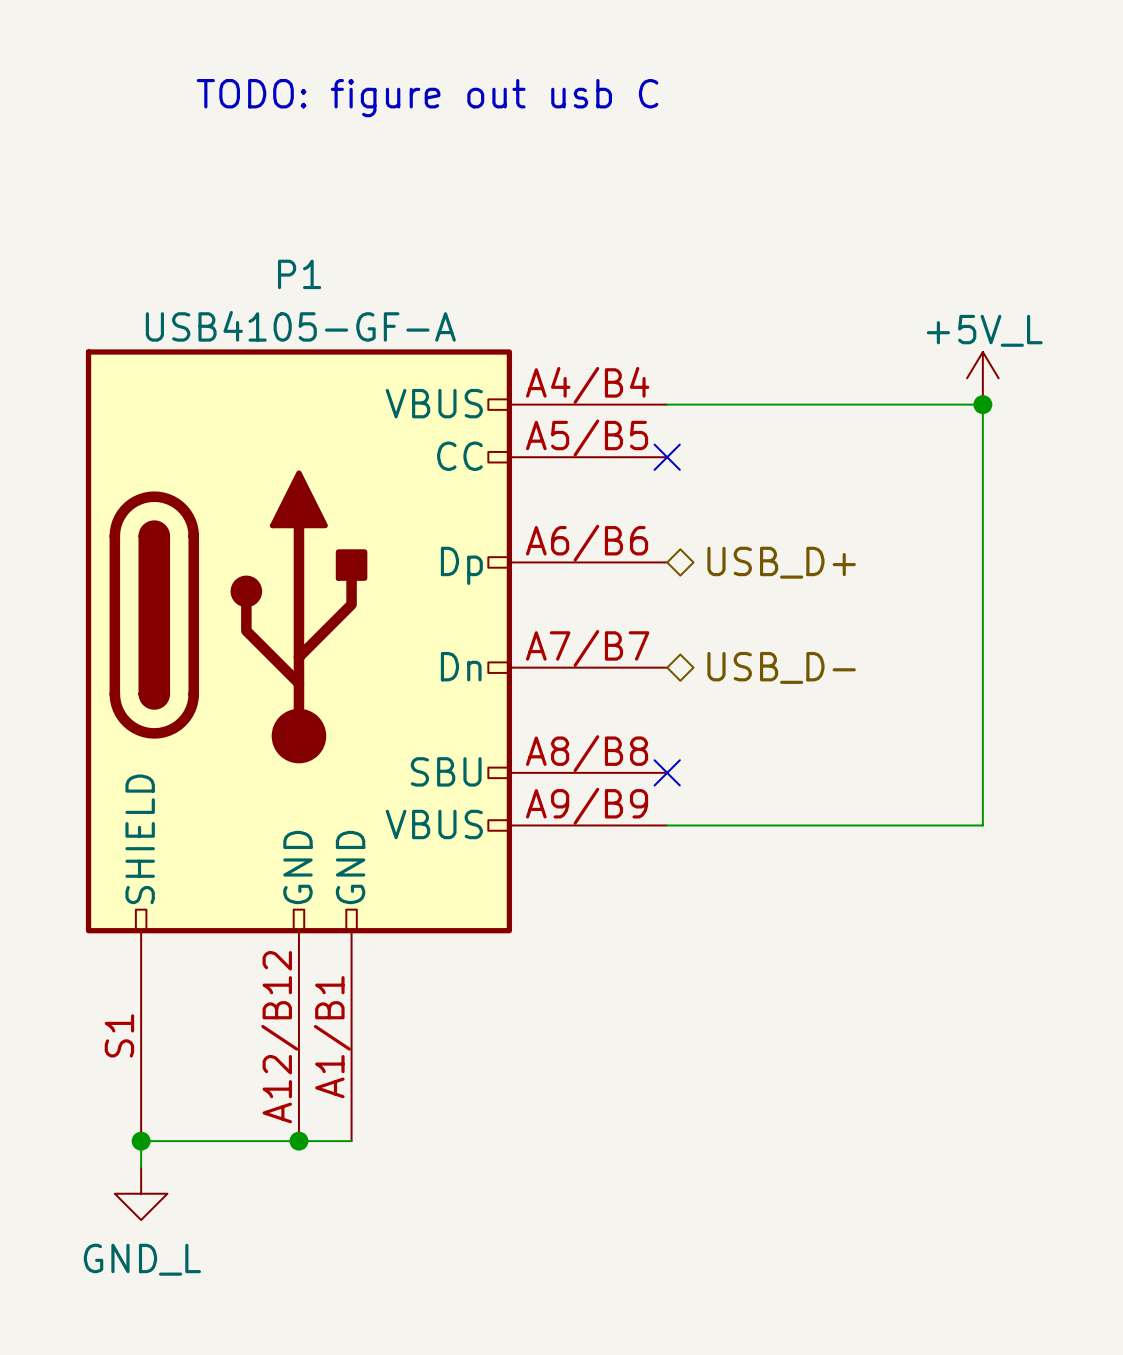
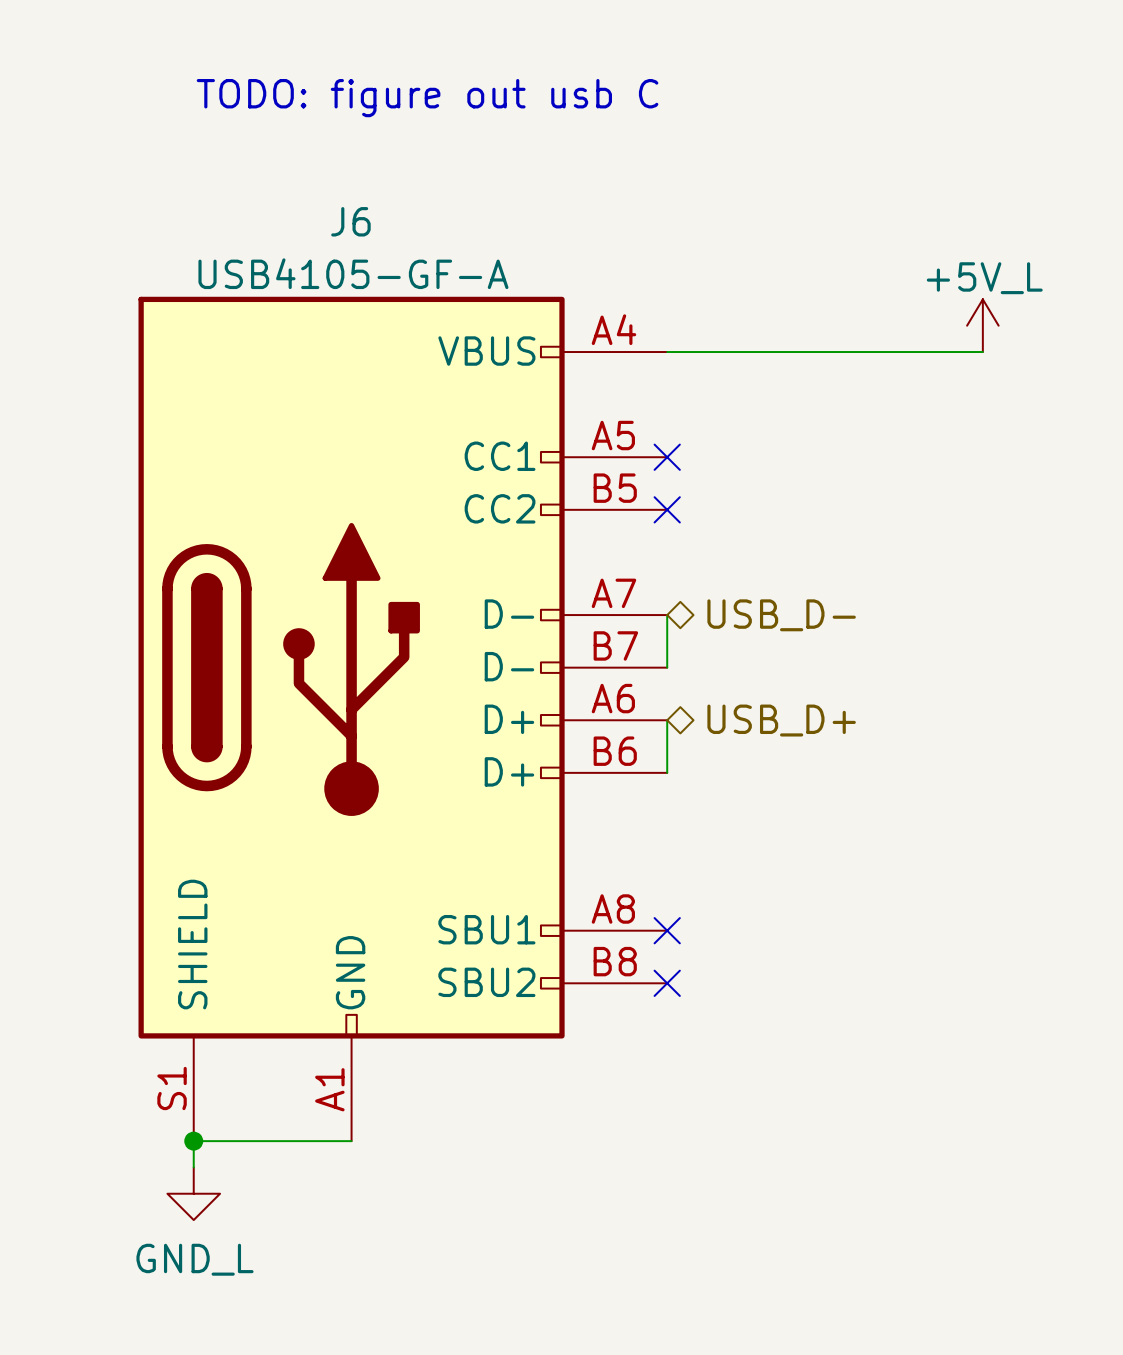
wire: none -> (667, 352) (982, 352)
power symbol position: +5V_L (982, 378) -> +5V_L (982, 325)
wire: (667, 404) (982, 404) (982, 825) (667, 825) -> none
junction: (982, 404) -> none
no-connect mark: none -> (667, 509)
hierarchical label position: USB_D+ (781, 562) -> USB_D+ (781, 720)
wire: none -> (667, 615) (667, 667)
hierarchical label position: USB_D- (781, 667) -> USB_D- (781, 615)
J6: none -> USB4105-GF-A (402, 718)
wire: none -> (667, 720) (667, 772)
P1: USB4105-GF-A (376, 745) -> none
no-connect mark: (667, 772) -> none
no-connect mark: none -> (667, 930)
no-connect mark: none -> (667, 983)
junction: (141, 1141) -> none
wire: (193, 1141) (141, 1141) (141, 1167) -> (193, 1141) (193, 1167)
junction: none -> (193, 1141)
junction: (298, 1141) -> none
power symbol position: GND_L (141, 1193) -> GND_L (193, 1193)

